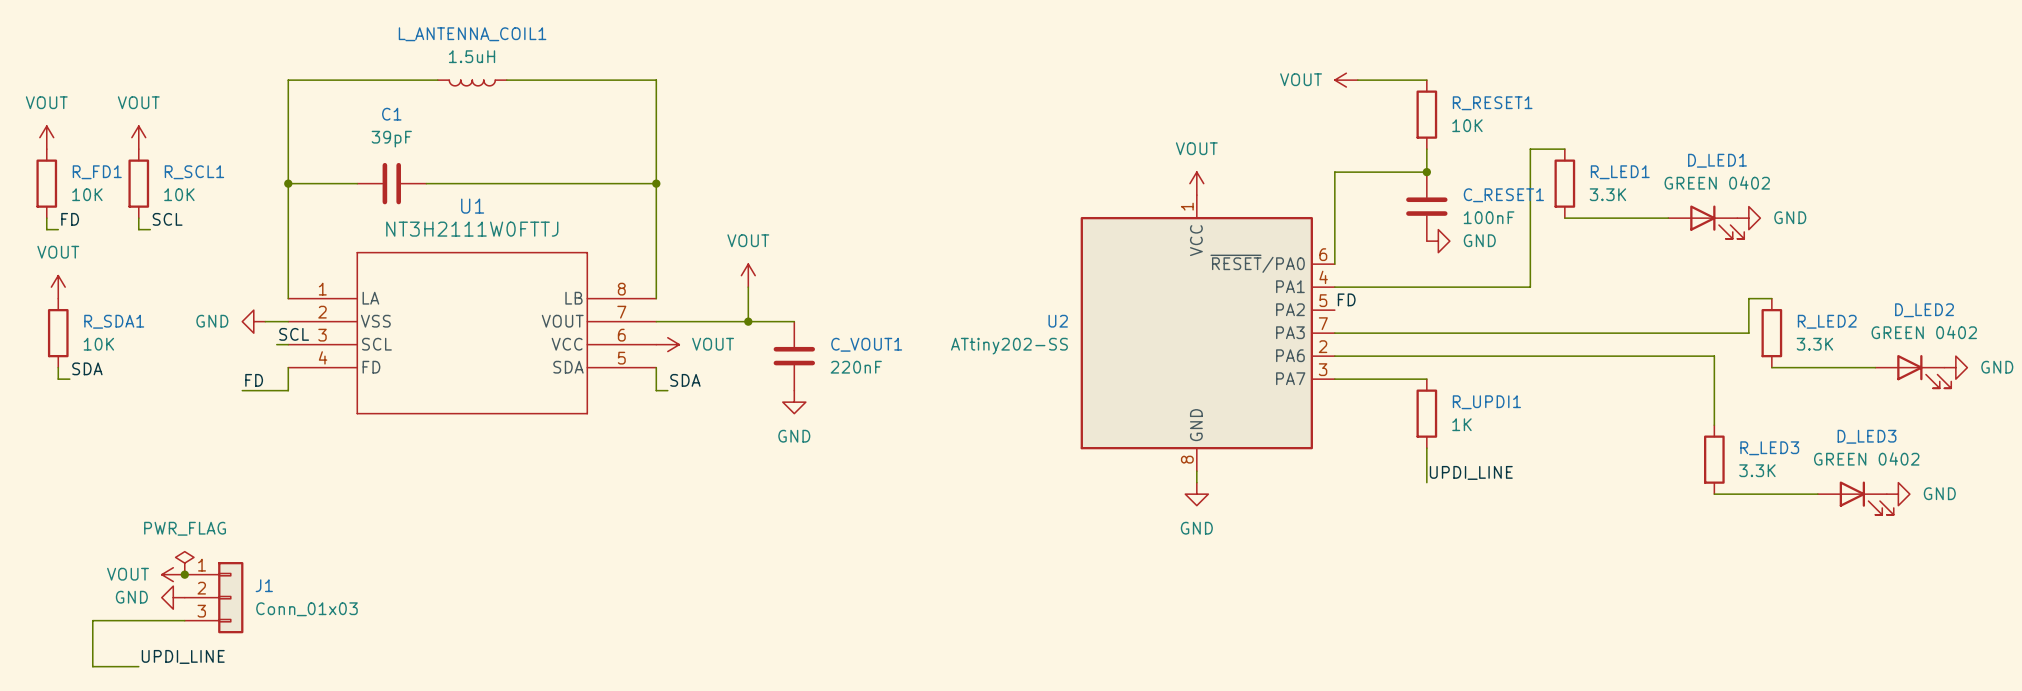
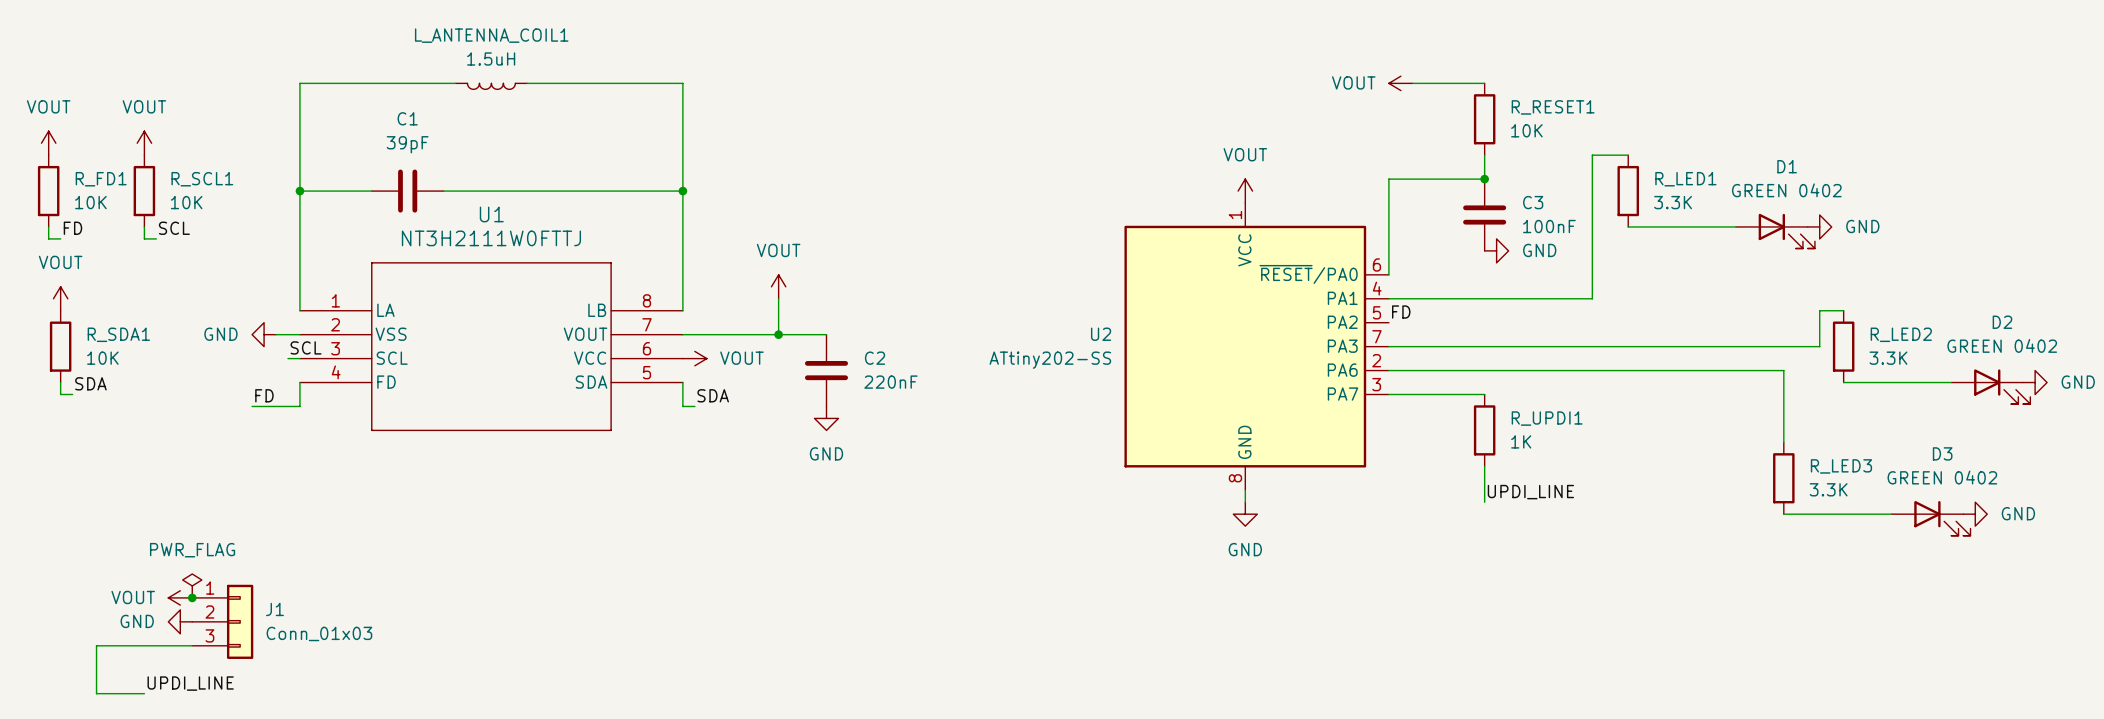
D_LED1 name: D_LED1 (1717, 160) -> D1 (1787, 166)
C_RESET1 name: C_RESET1 (1503, 195) -> C3 (1533, 202)
D_LED2 name: D_LED2 (1924, 310) -> D2 (2002, 322)
C_VOUT1 name: C_VOUT1 (866, 344) -> C2 (875, 358)
D_LED3 name: D_LED3 (1867, 436) -> D3 (1942, 453)

